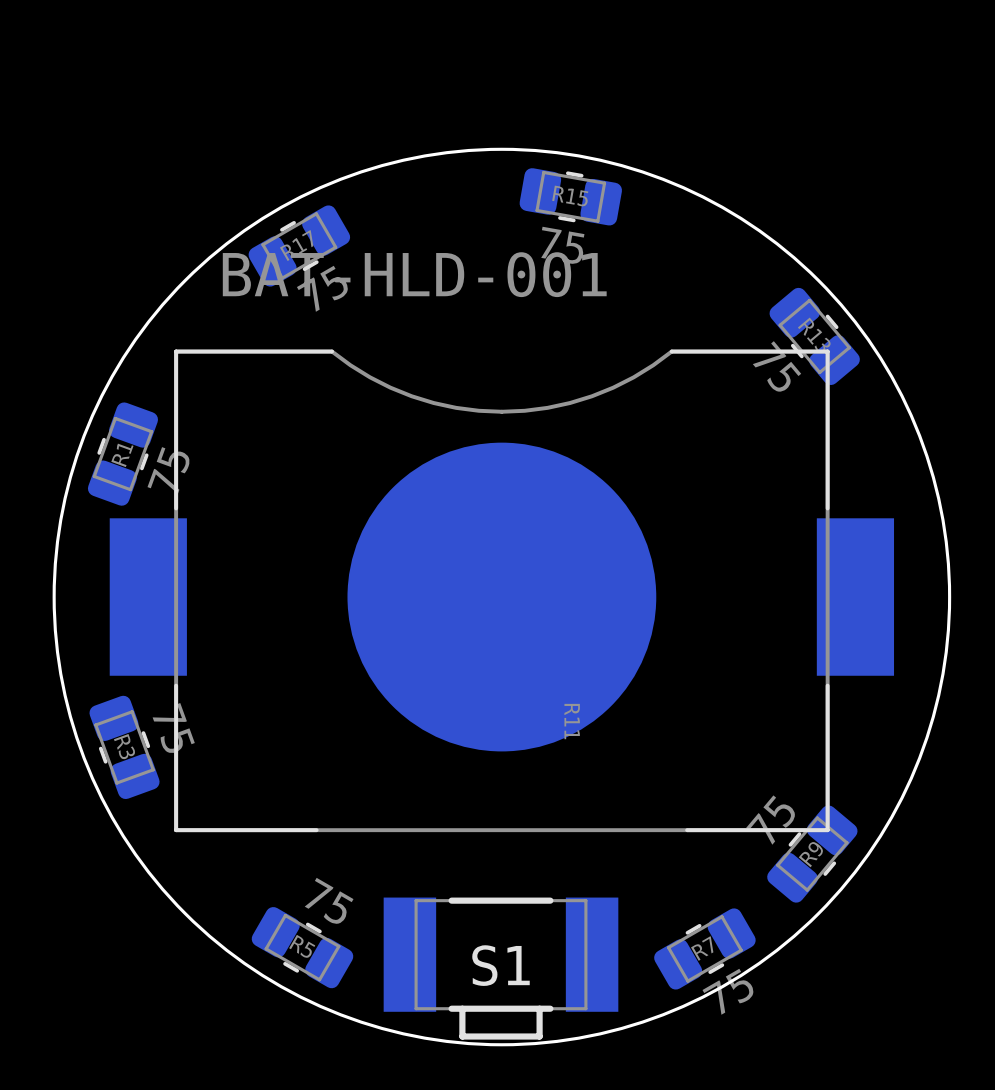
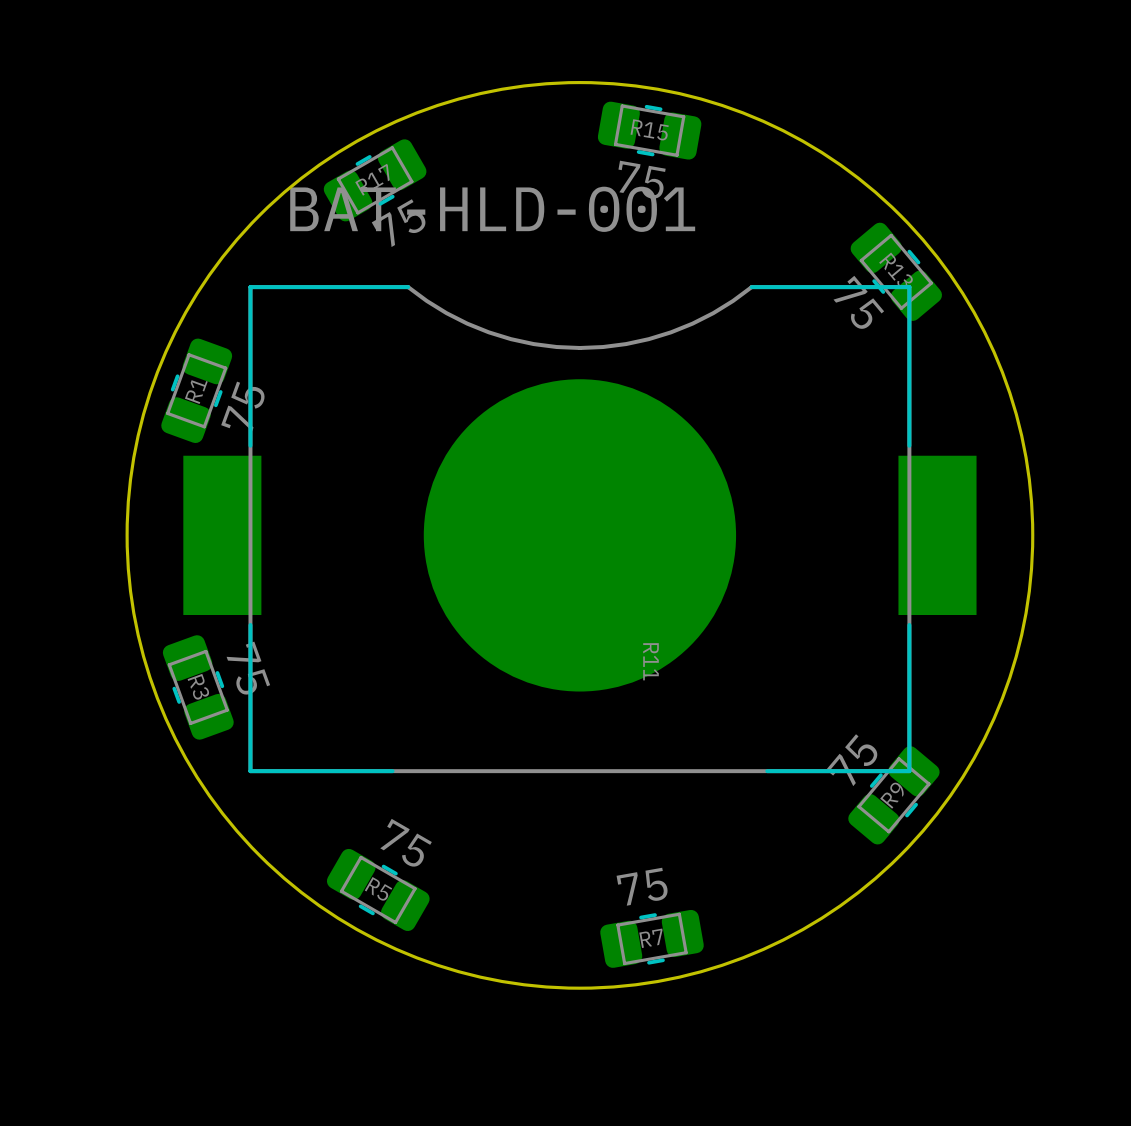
R7 rotation: 0° (704, 948) -> 20° clockwise (652, 938)
R7 position: (704, 948) -> (652, 938)
S1: (500, 968) -> none
R7 value position: 75 (728, 991) -> 75 (642, 886)

